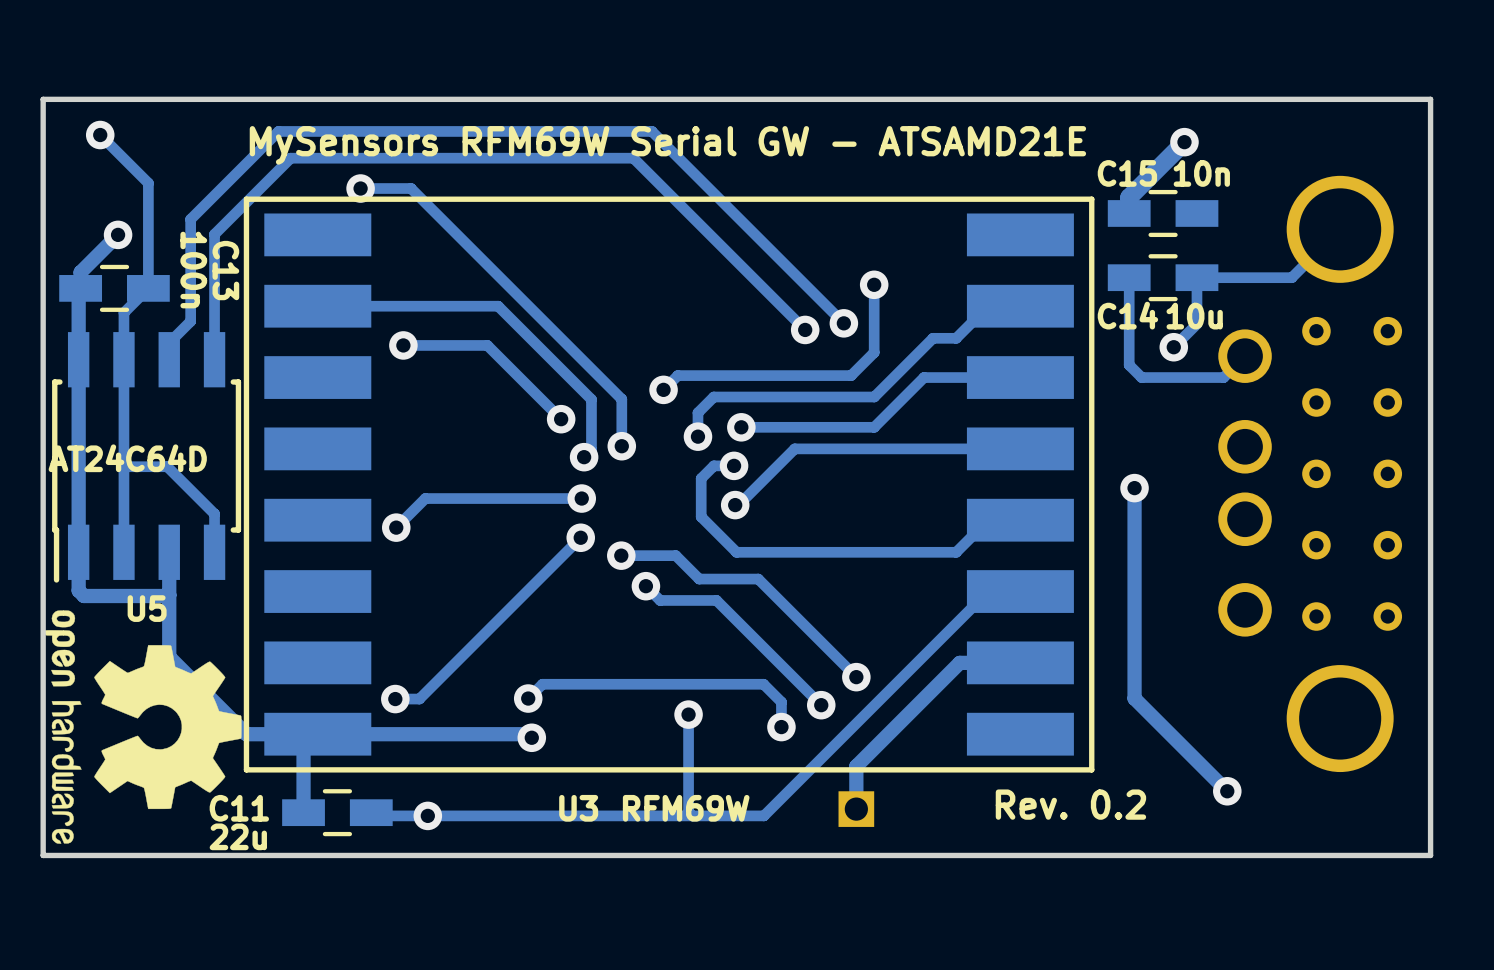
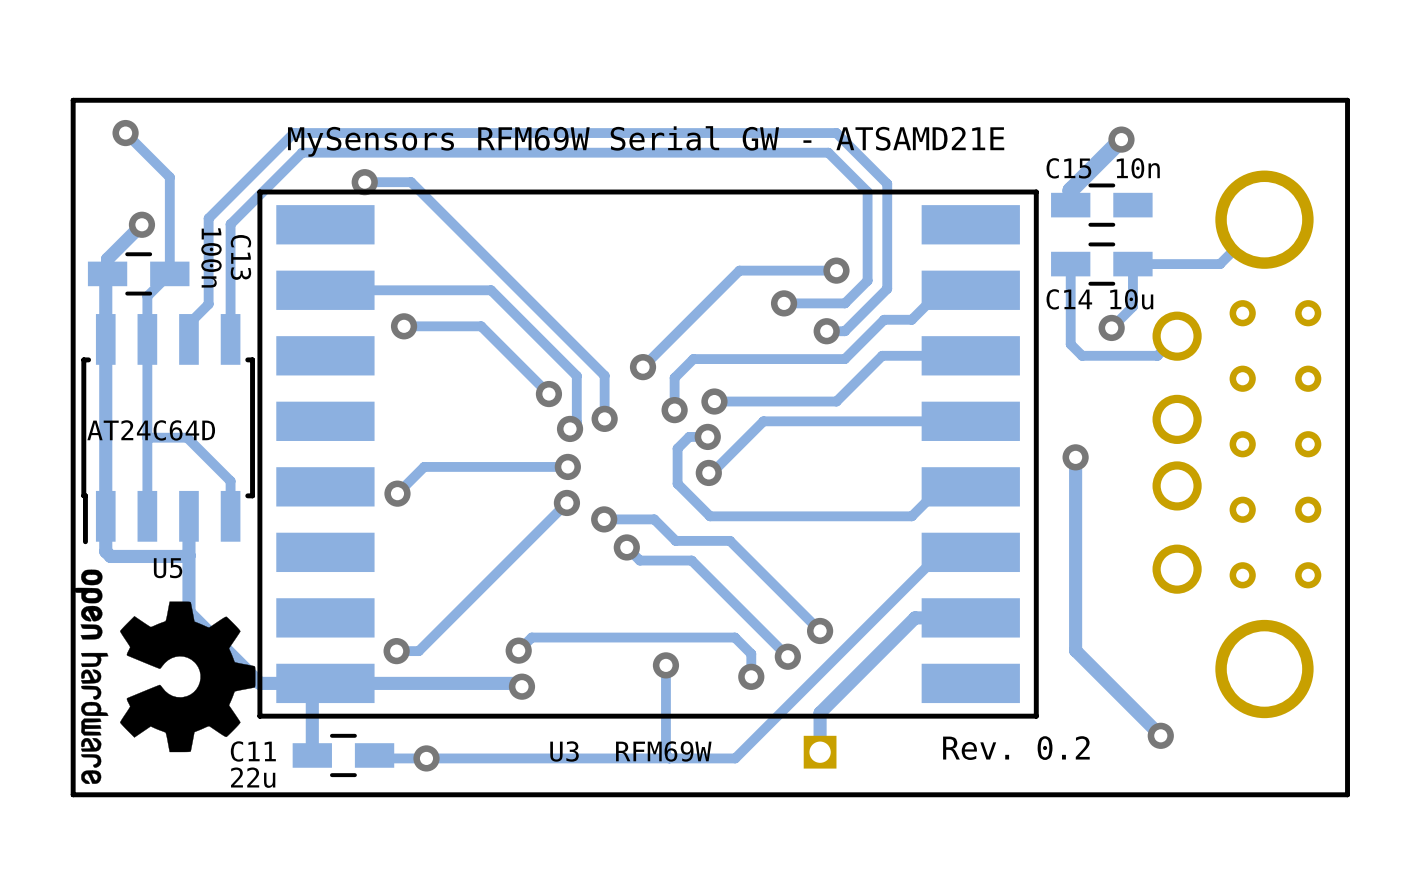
track: (290, 158) (633, 158) (805, 329) -> (300, 154) (302, 152) (828, 152) (867, 191) (867, 280) (844, 303) (784, 303)
track: (190, 227) (190, 219) (278, 131) (651, 131) (843, 323) -> (208, 218) (294, 133) (836, 133) (887, 183) (887, 288) (844, 331) (826, 331)
track: (874, 284) (874, 352) (851, 375) (677, 375) -> (836, 270) (739, 270) (656, 354)
via: none -> (784, 303)
via: (843, 323) -> none
via: (805, 329) -> none
track: (932, 338) (874, 397) (713, 397) (697, 412) -> (890, 319) (884, 319) (844, 359) (693, 359) (674, 377) (674, 388)
via: none -> (826, 331)

